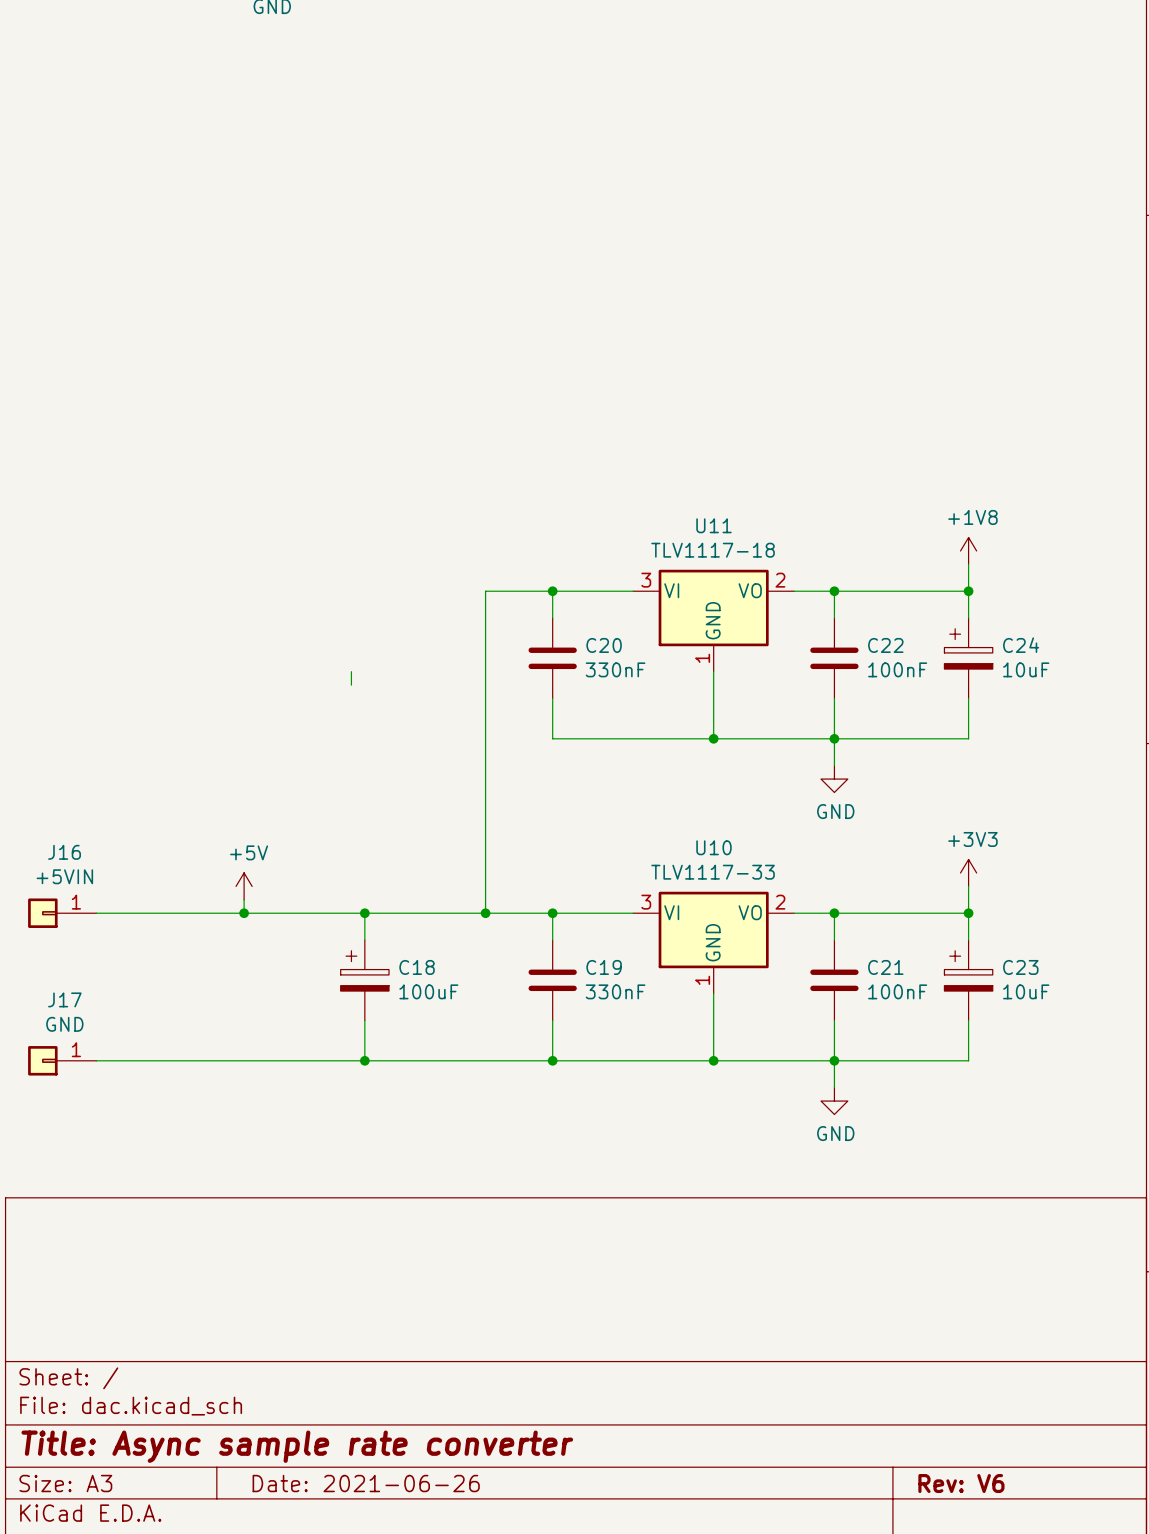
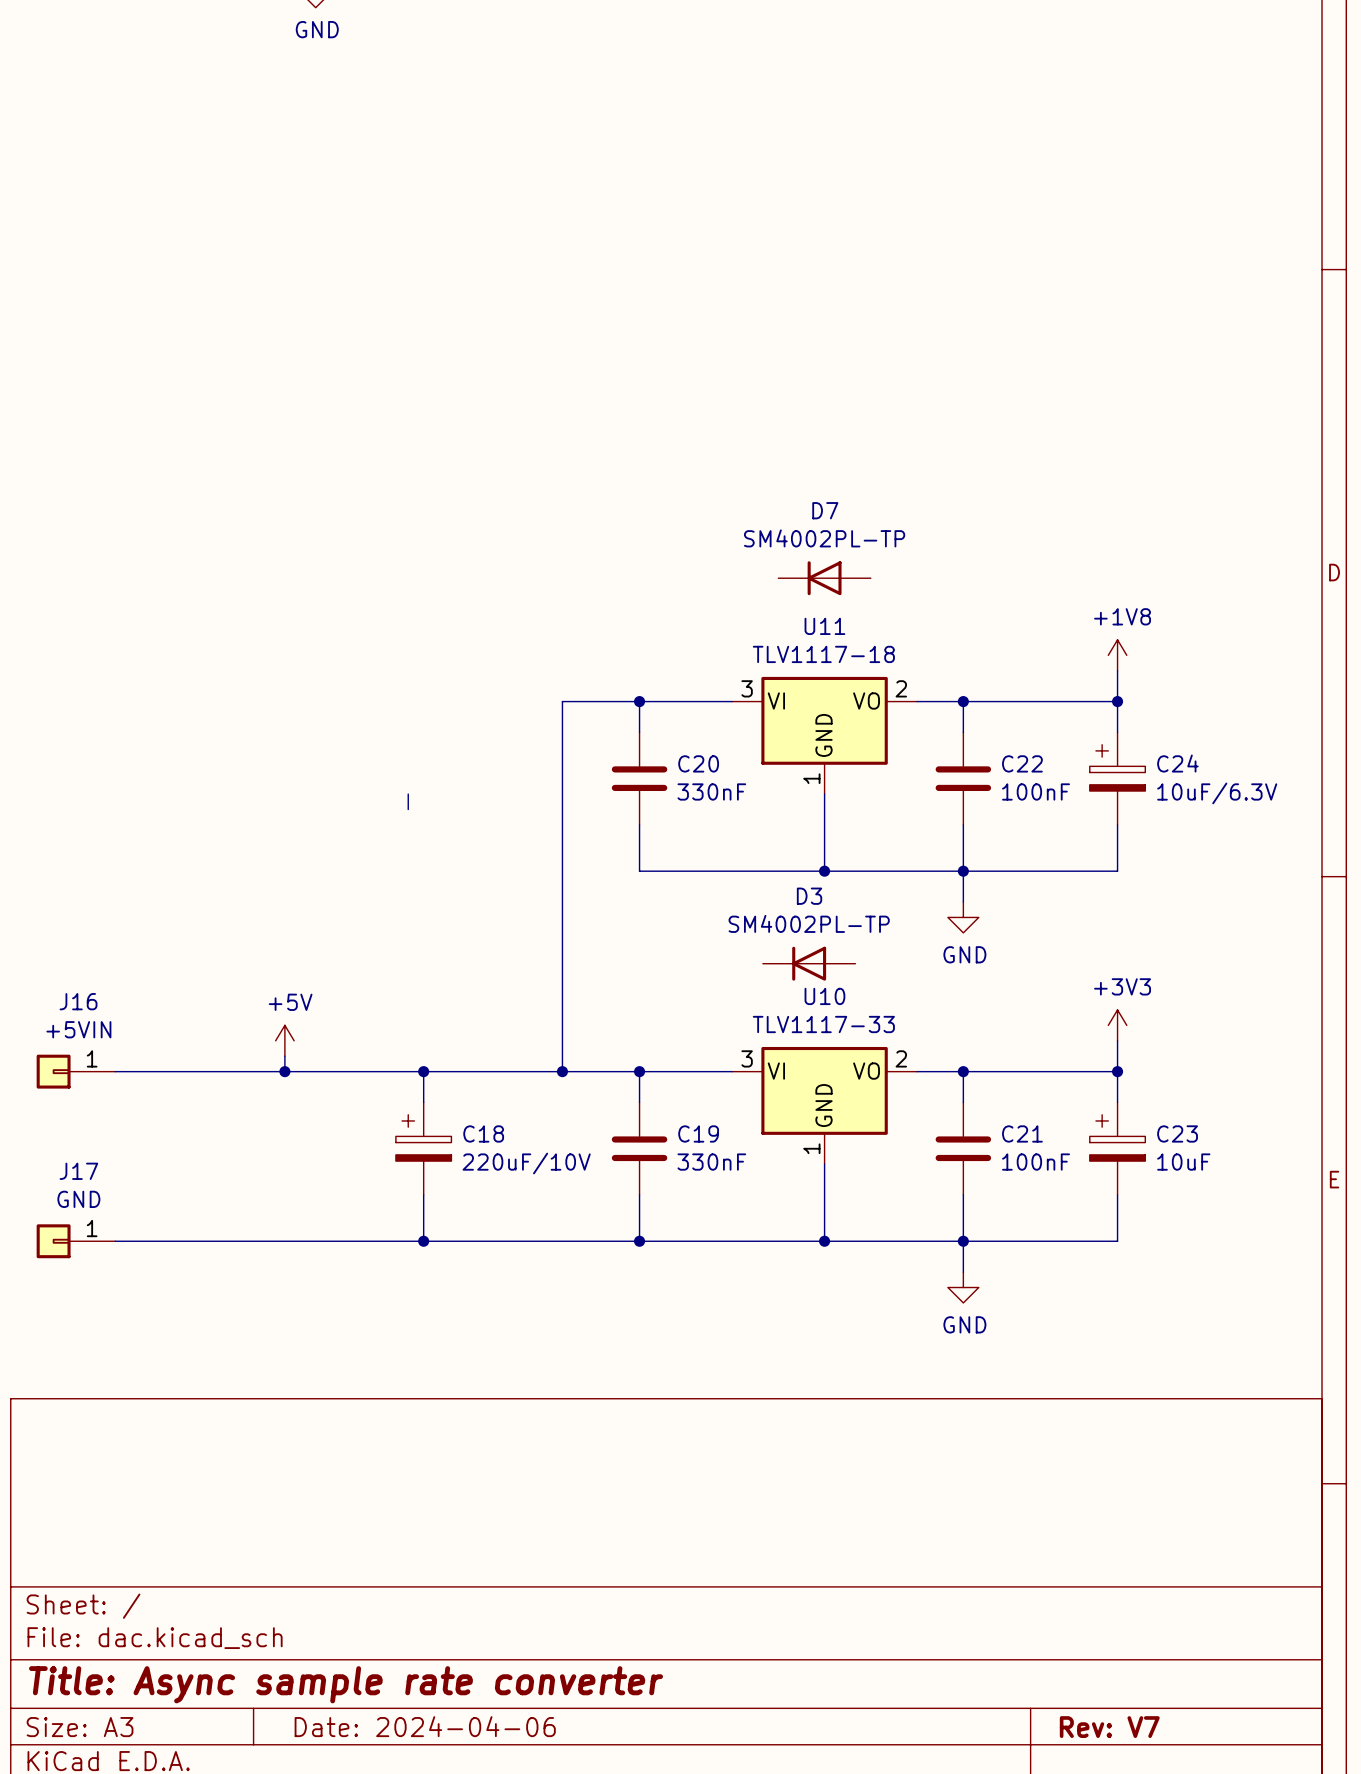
D7: none -> SM4002PL-TP (824, 578)
C24 value: 10uF (1026, 669) -> 10uF/6.3V (1217, 793)
D3: none -> SM4002PL-TP (809, 963)
C18 value: 100uF (428, 991) -> 220uF/10V (526, 1163)
title block: Date: 2021-06-26 (366, 1483) -> Date: 2024-04-06 (425, 1726)
title block: Rev: V6 (961, 1483) -> Rev: V7 (1109, 1727)

